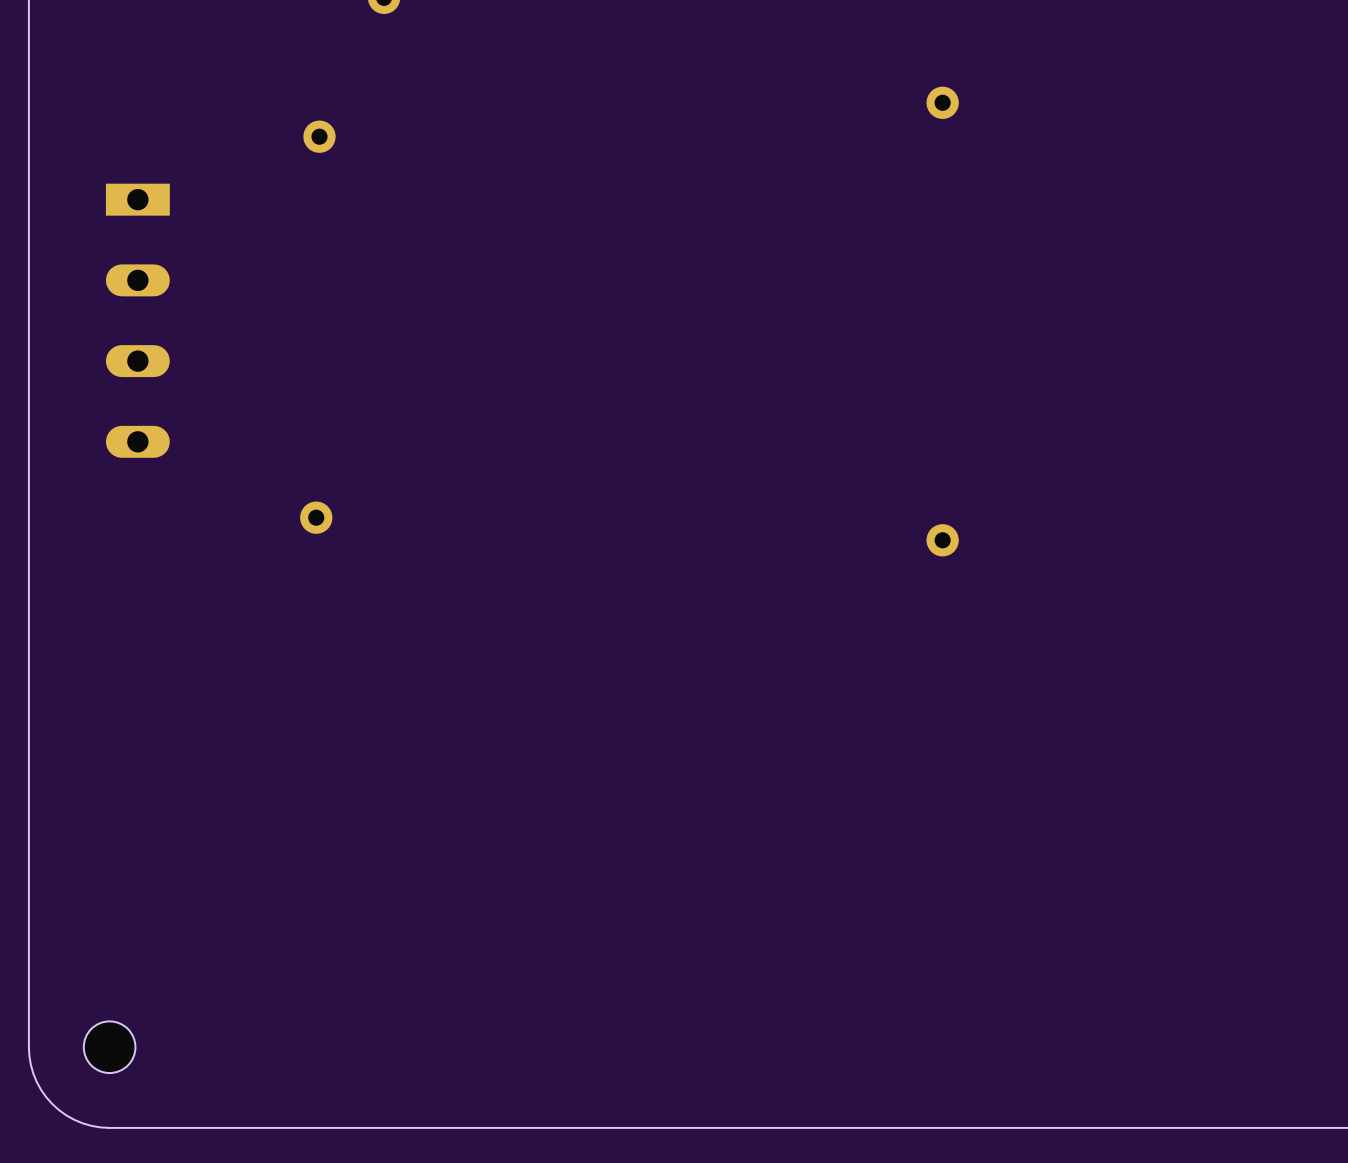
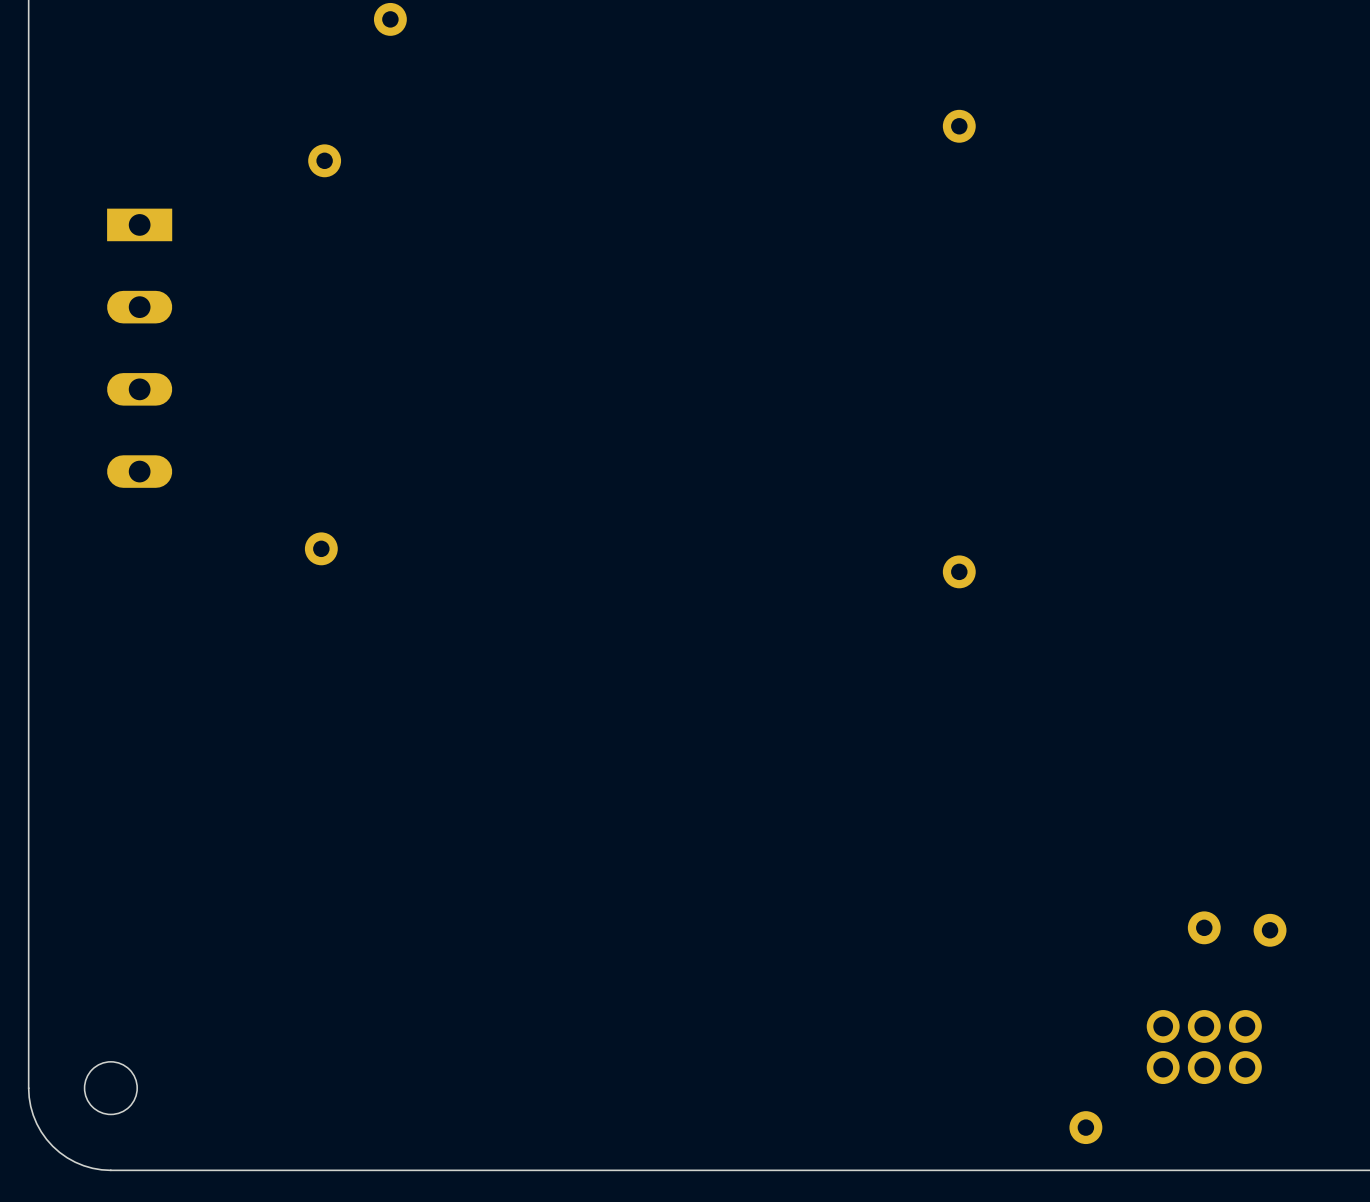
part: none -> (1204, 927)
part: none -> (1270, 930)
part: none -> (1204, 1047)
part: none -> (1085, 1127)

